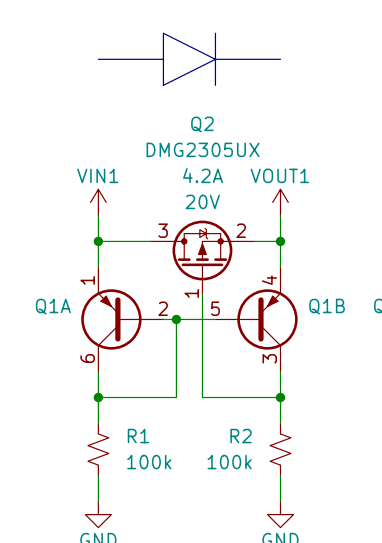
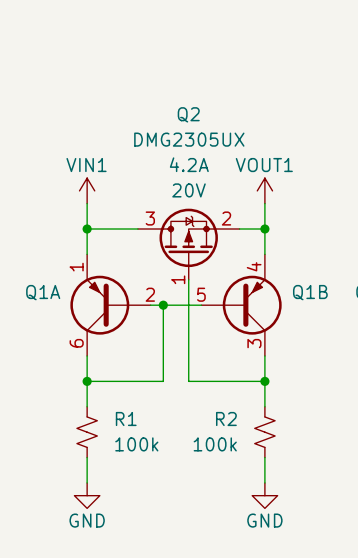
line: (215, 33) (215, 85) -> none
line: (98, 59) (163, 59) -> none
line: (215, 59) (280, 59) -> none
line: (215, 59) (163, 85) (163, 33) (215, 59) -> none

